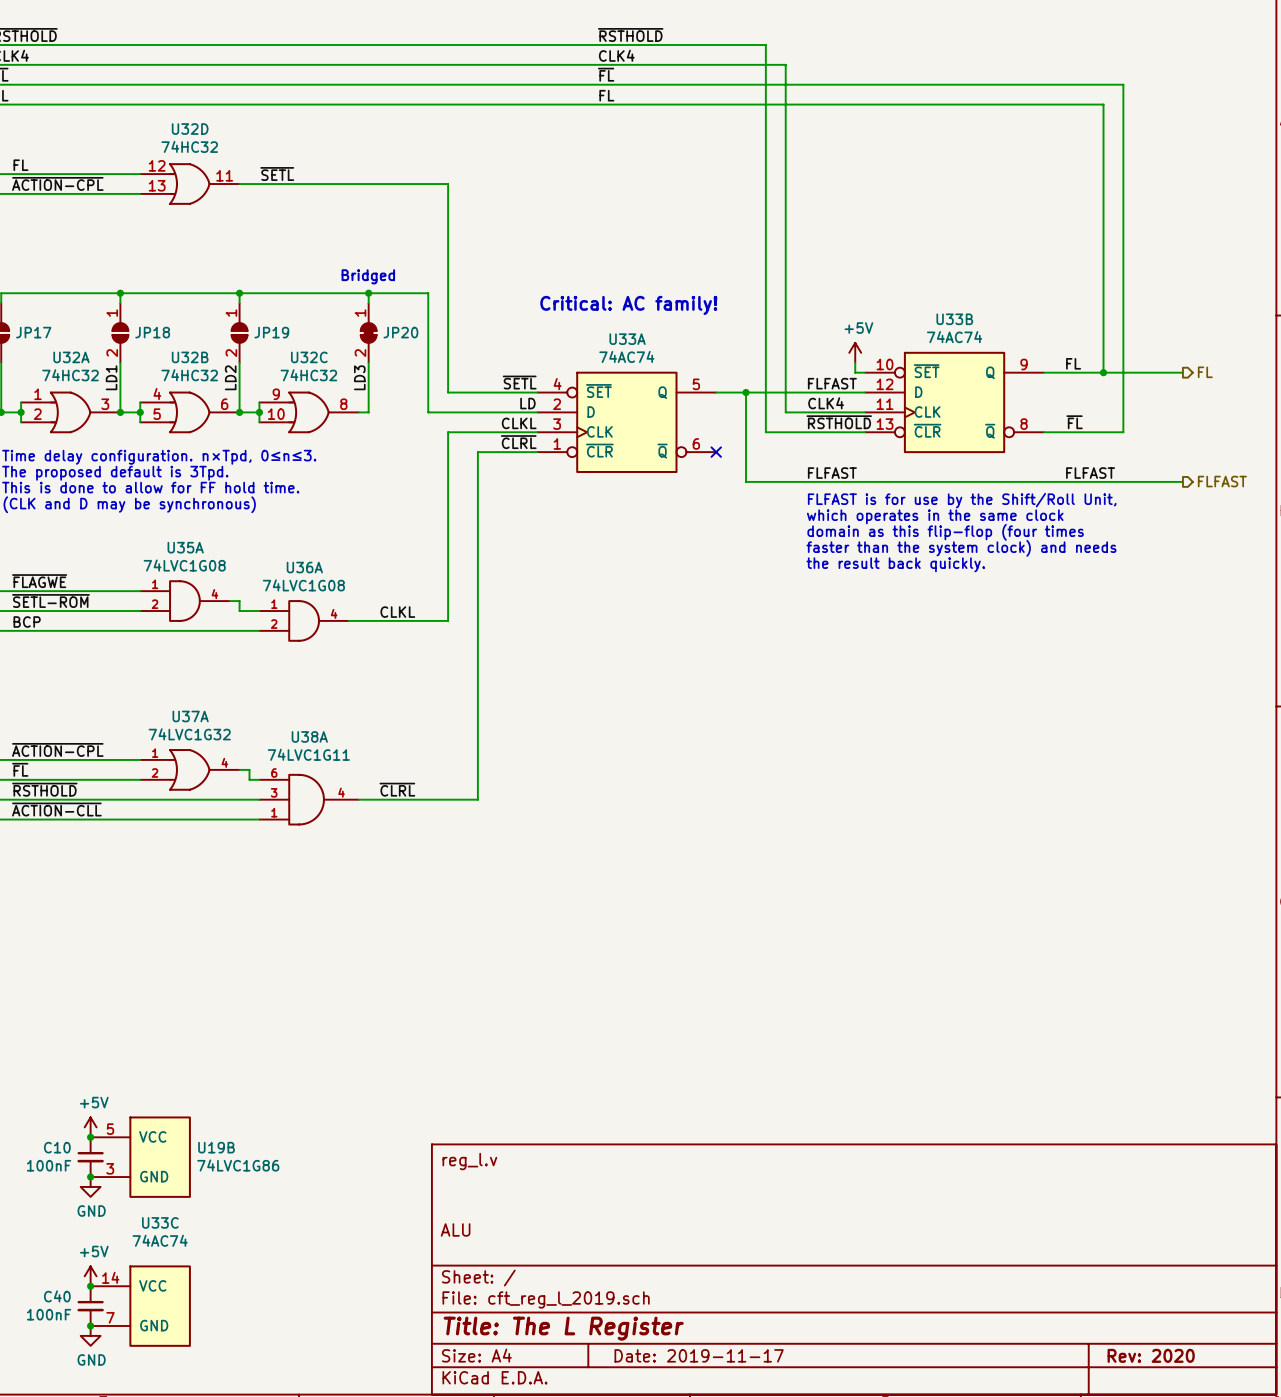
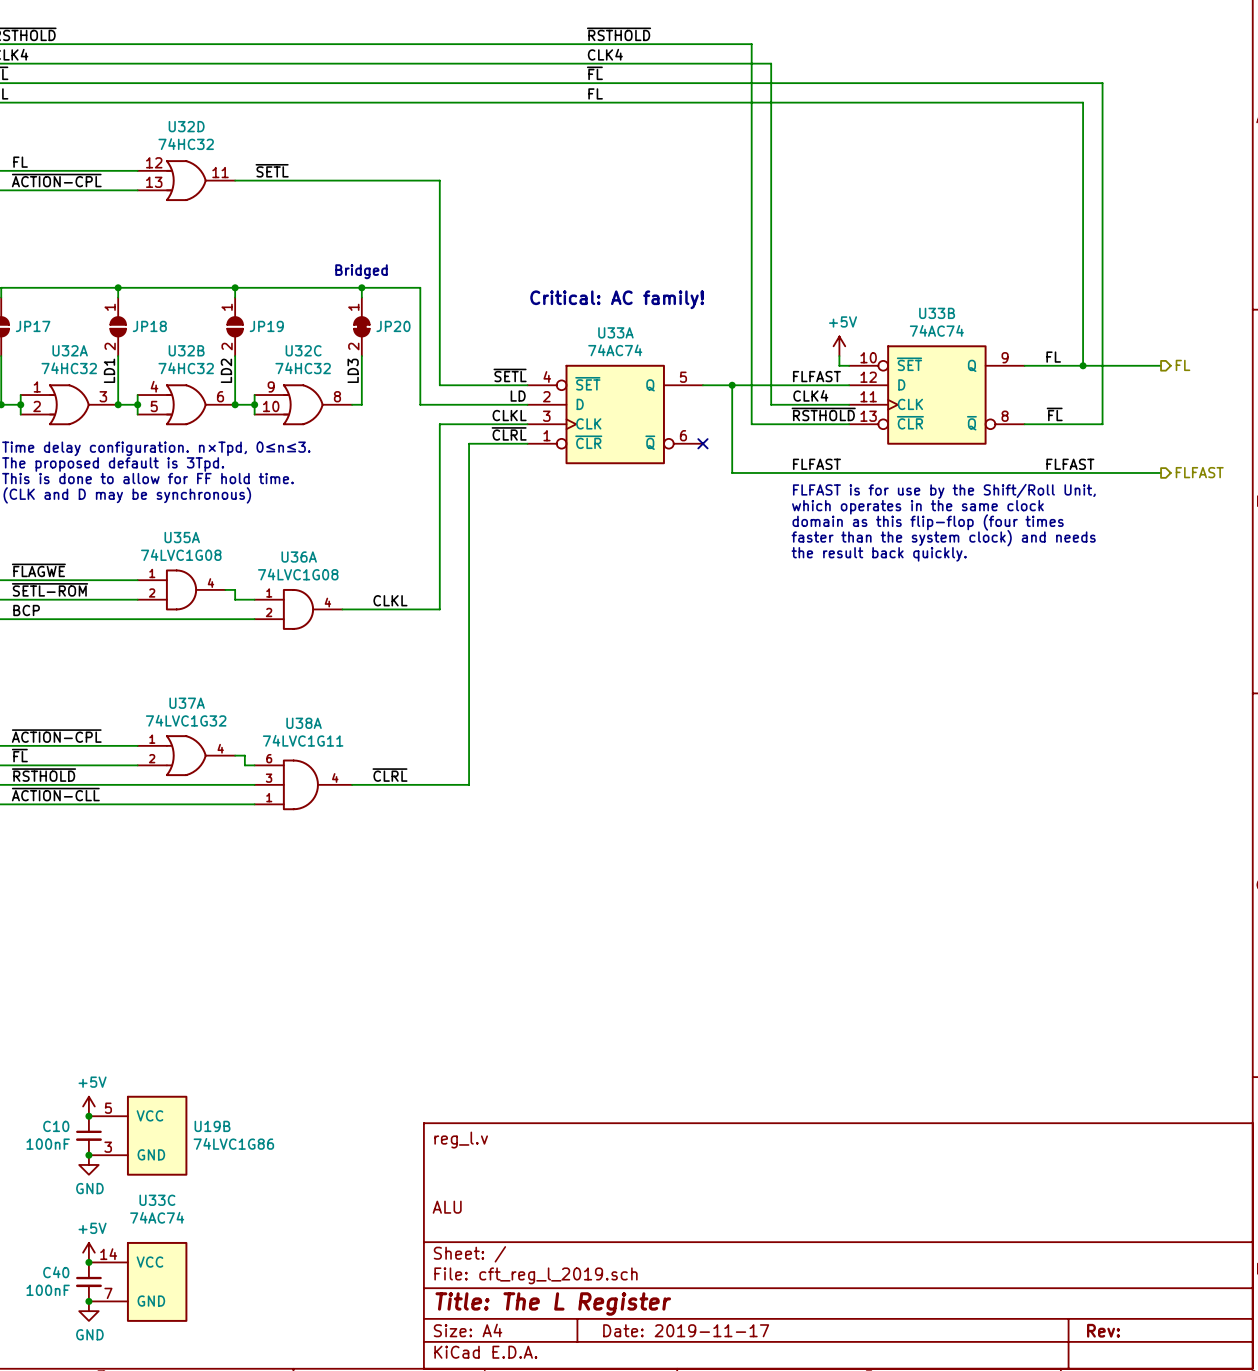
title block: Rev: 2020 (1151, 1355) -> Rev: (1103, 1330)

